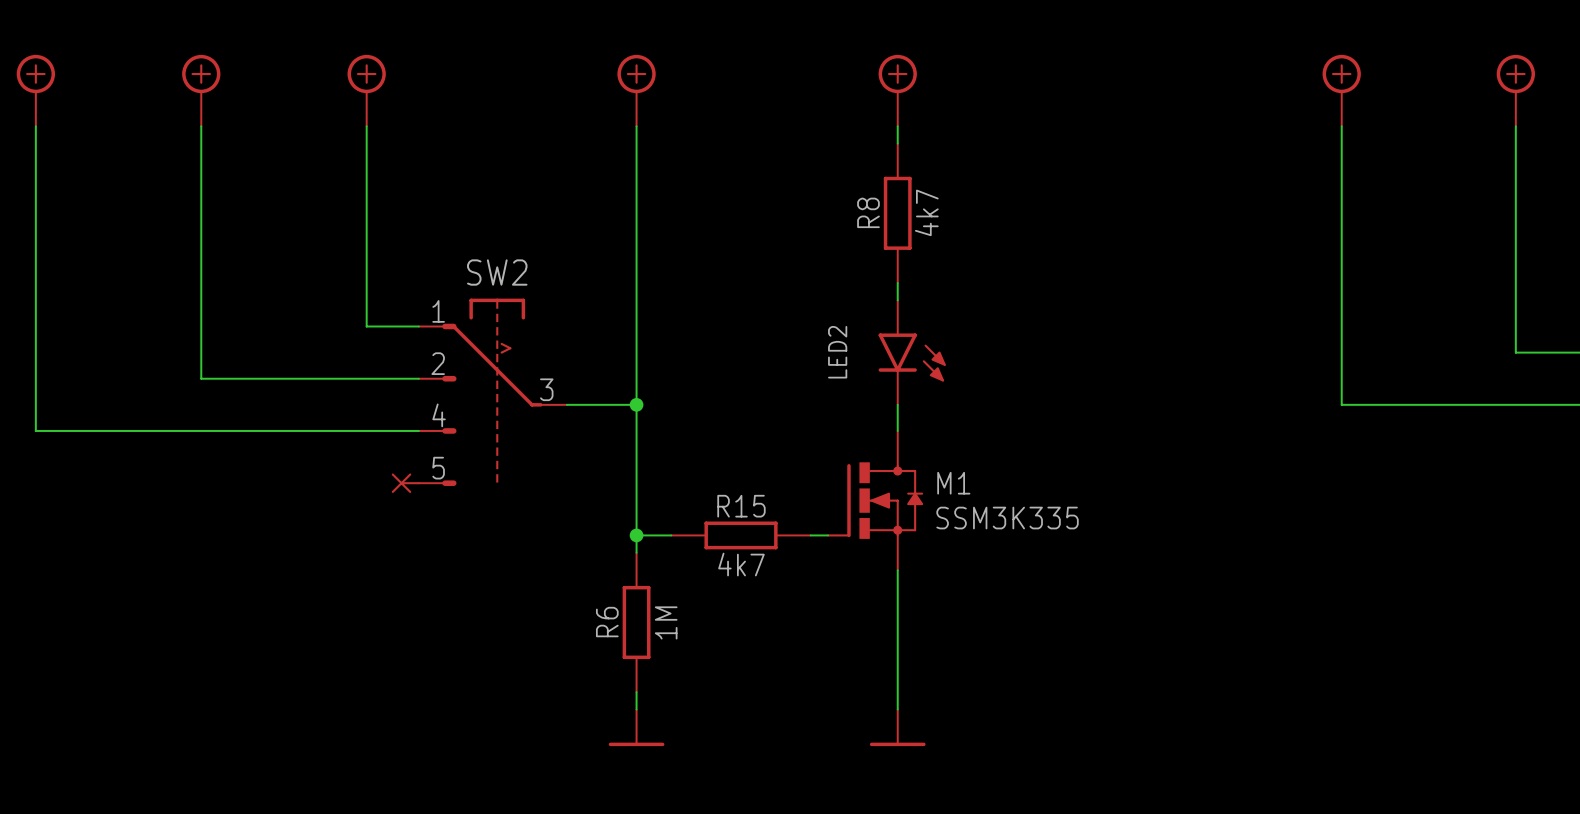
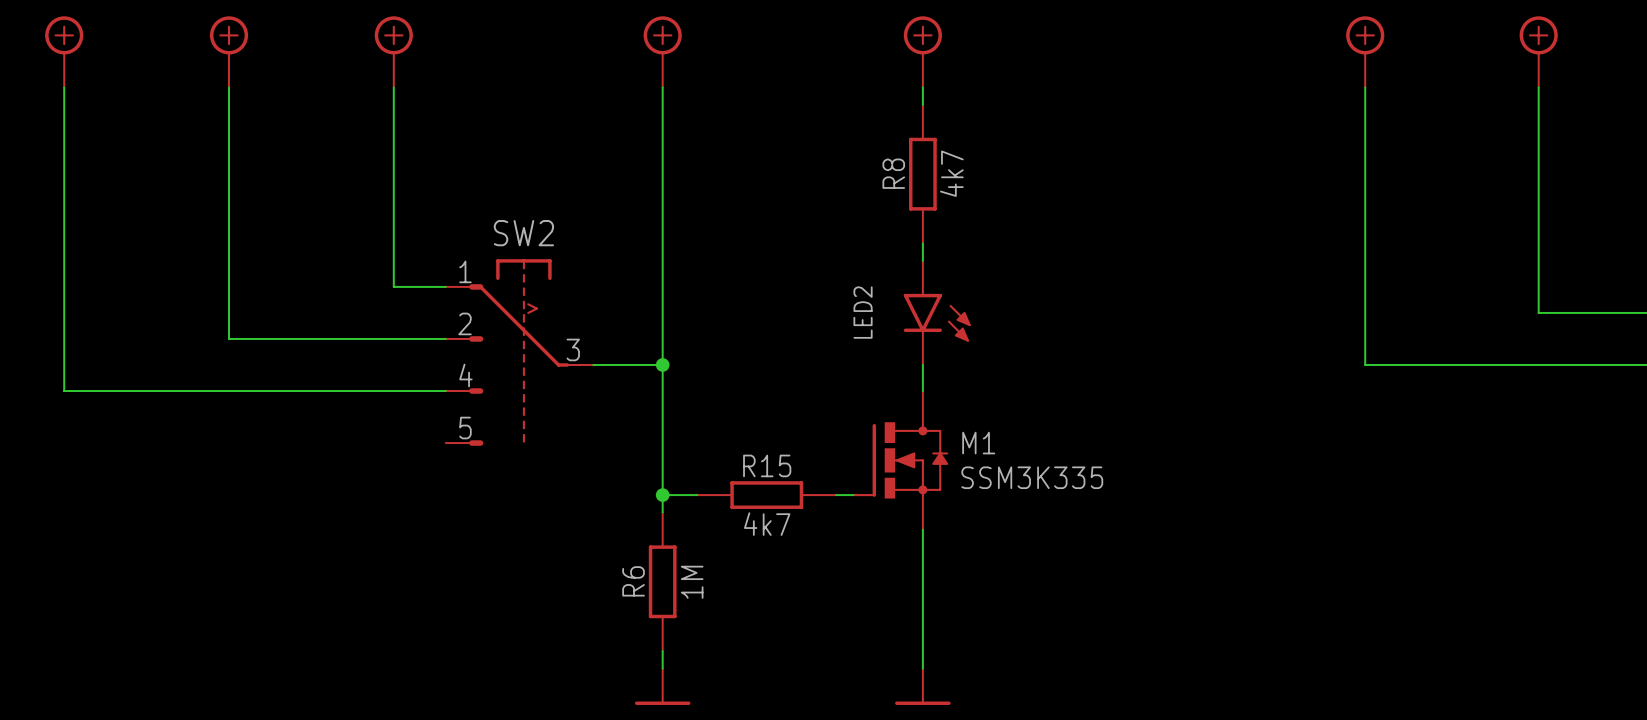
part: (405, 483) -> none

